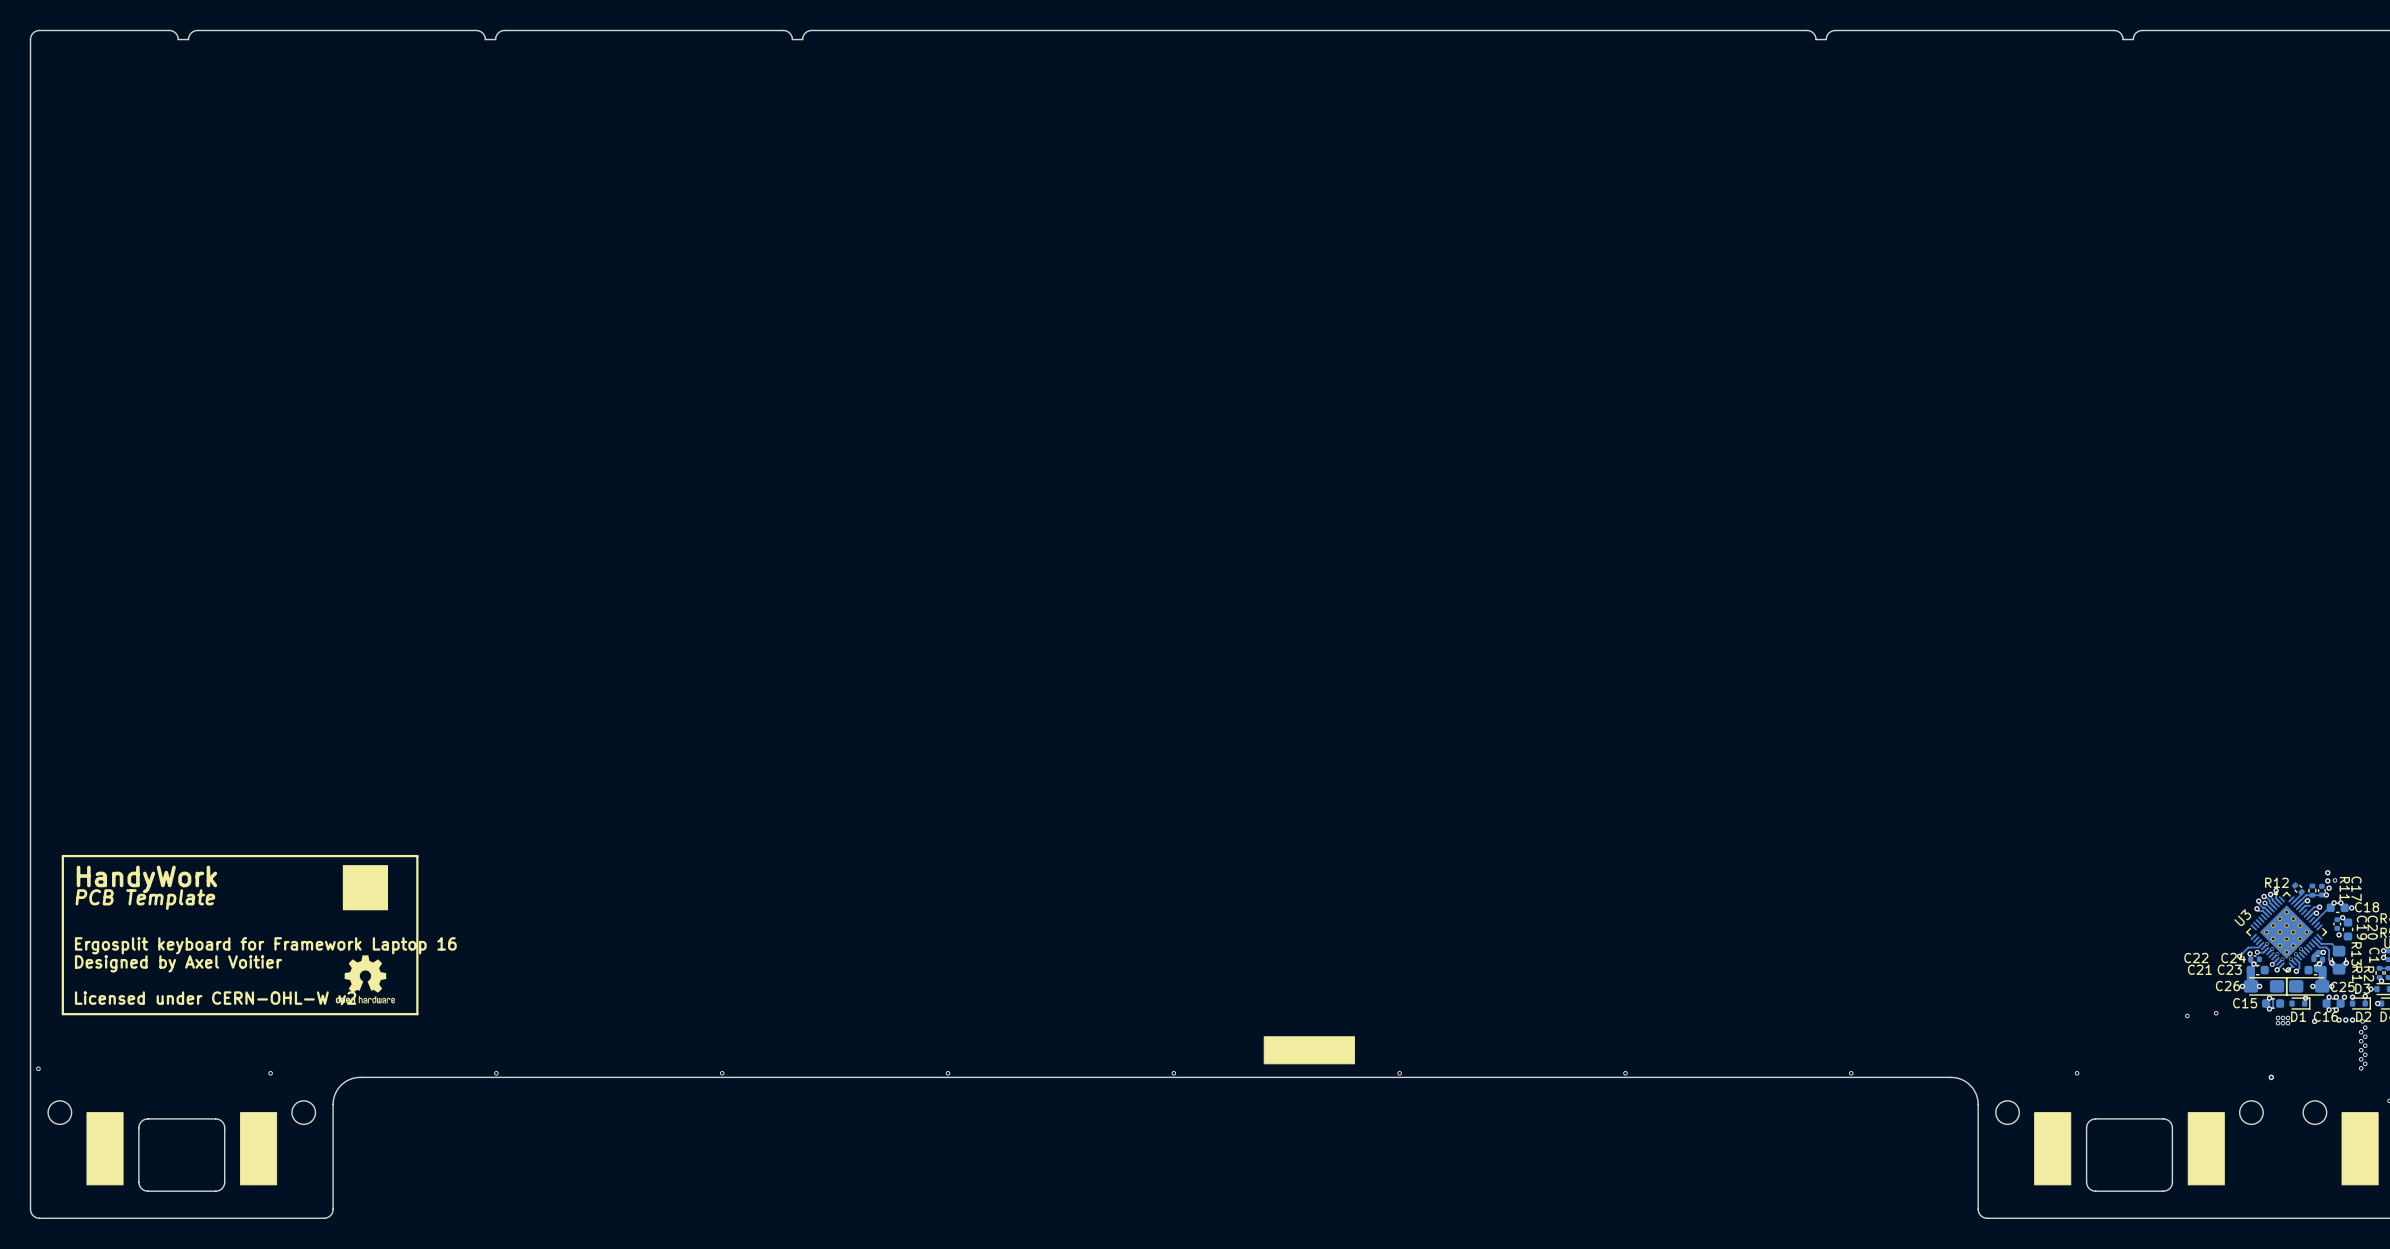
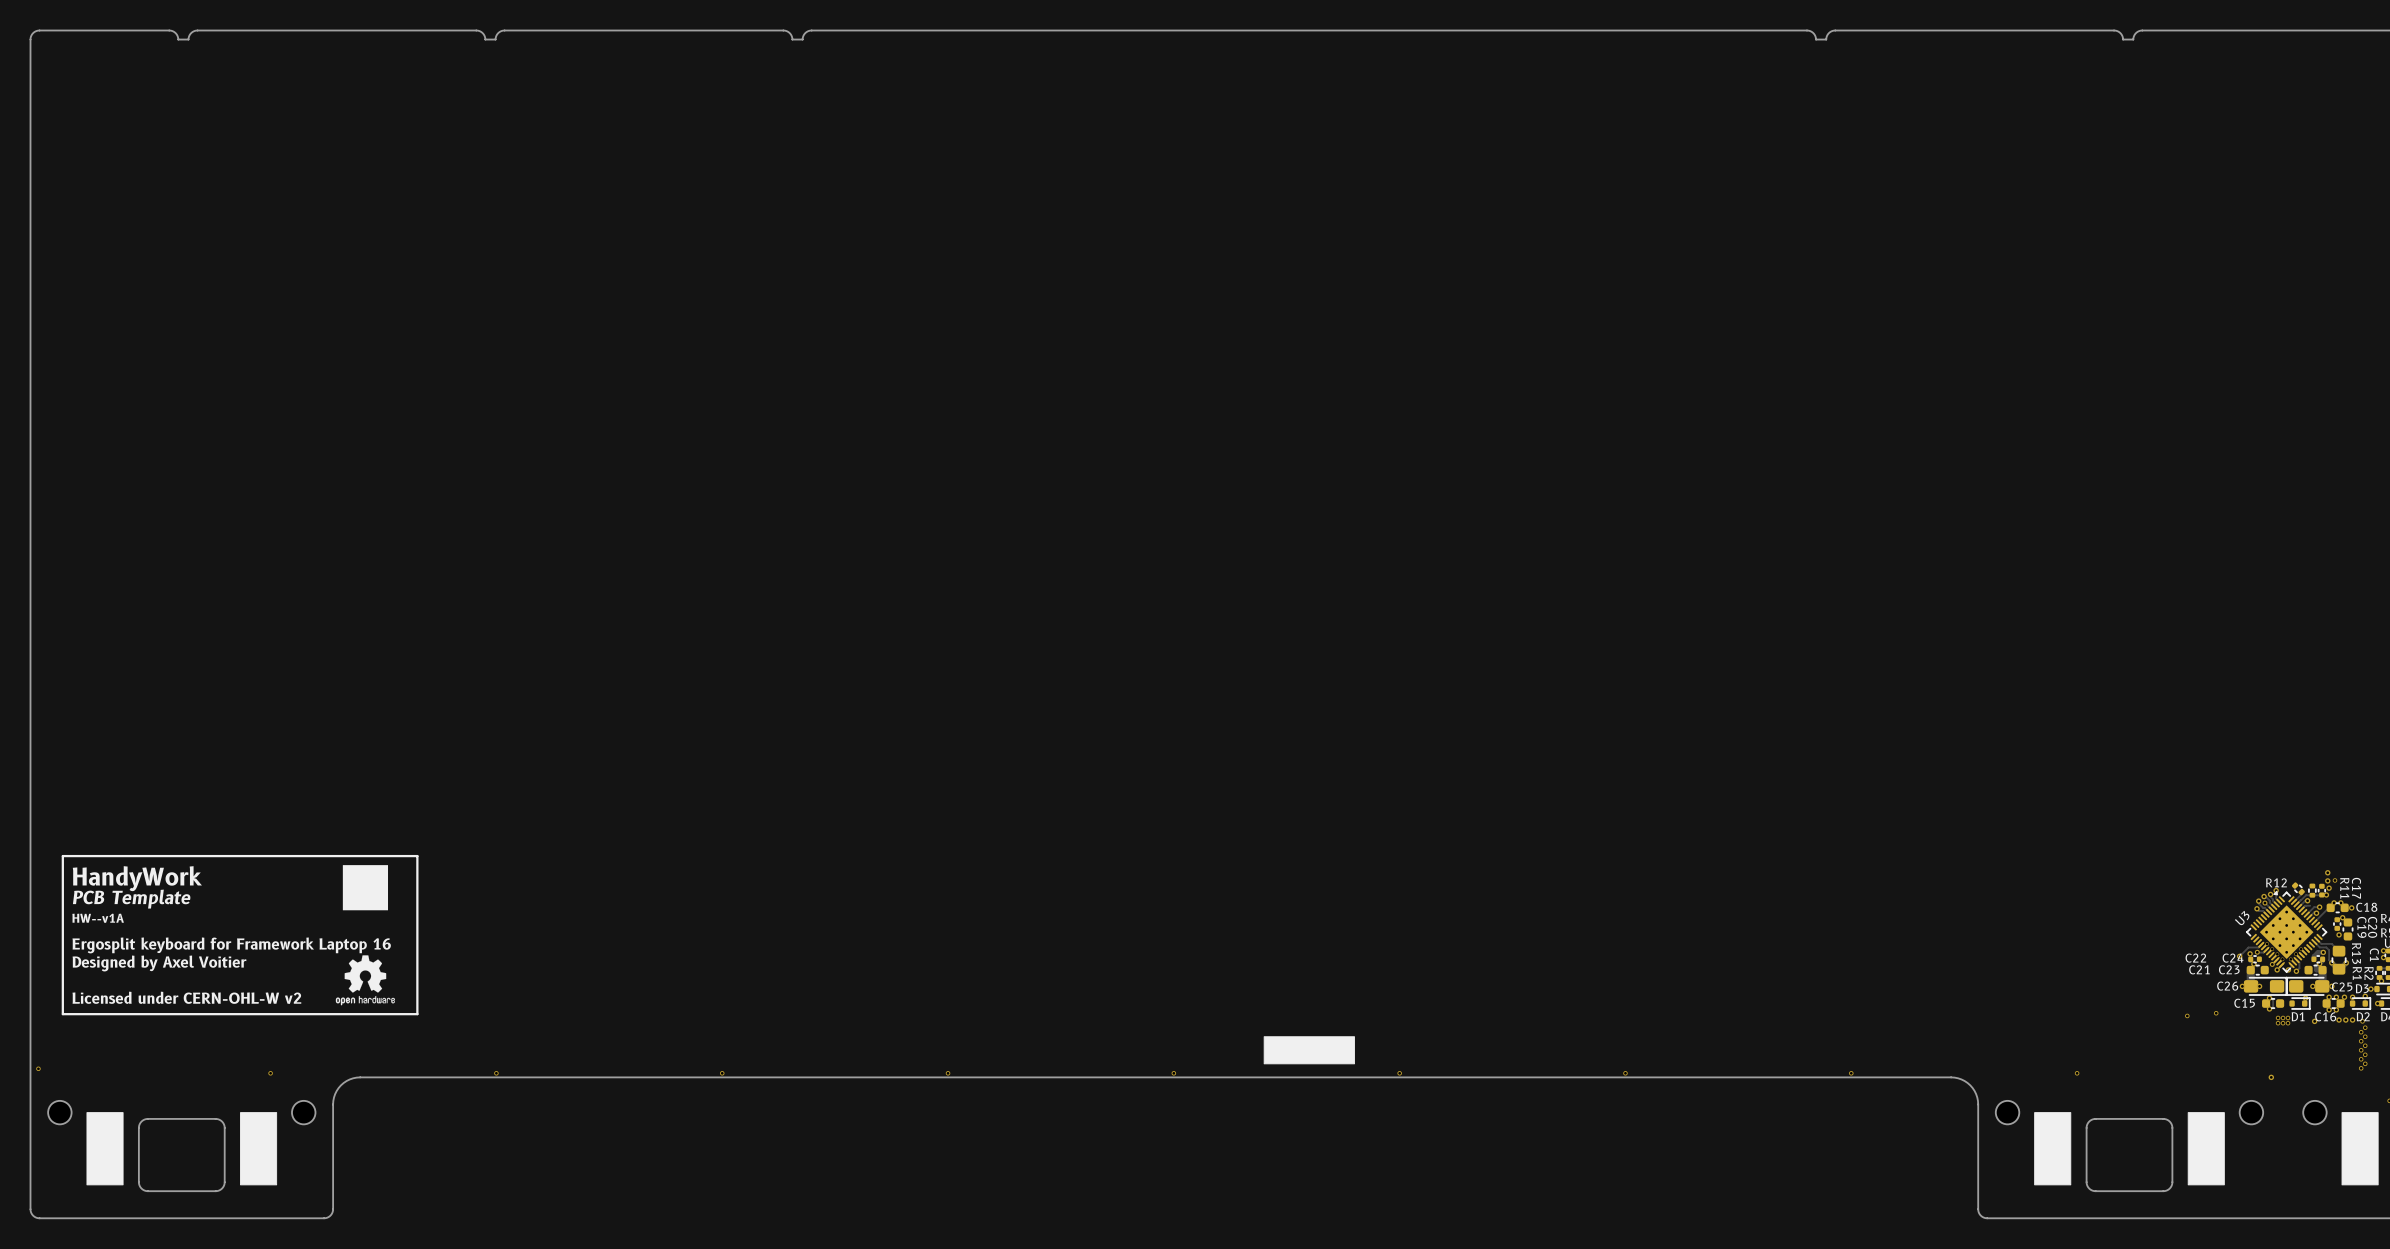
text: none -> HW--v1A (98, 918)

